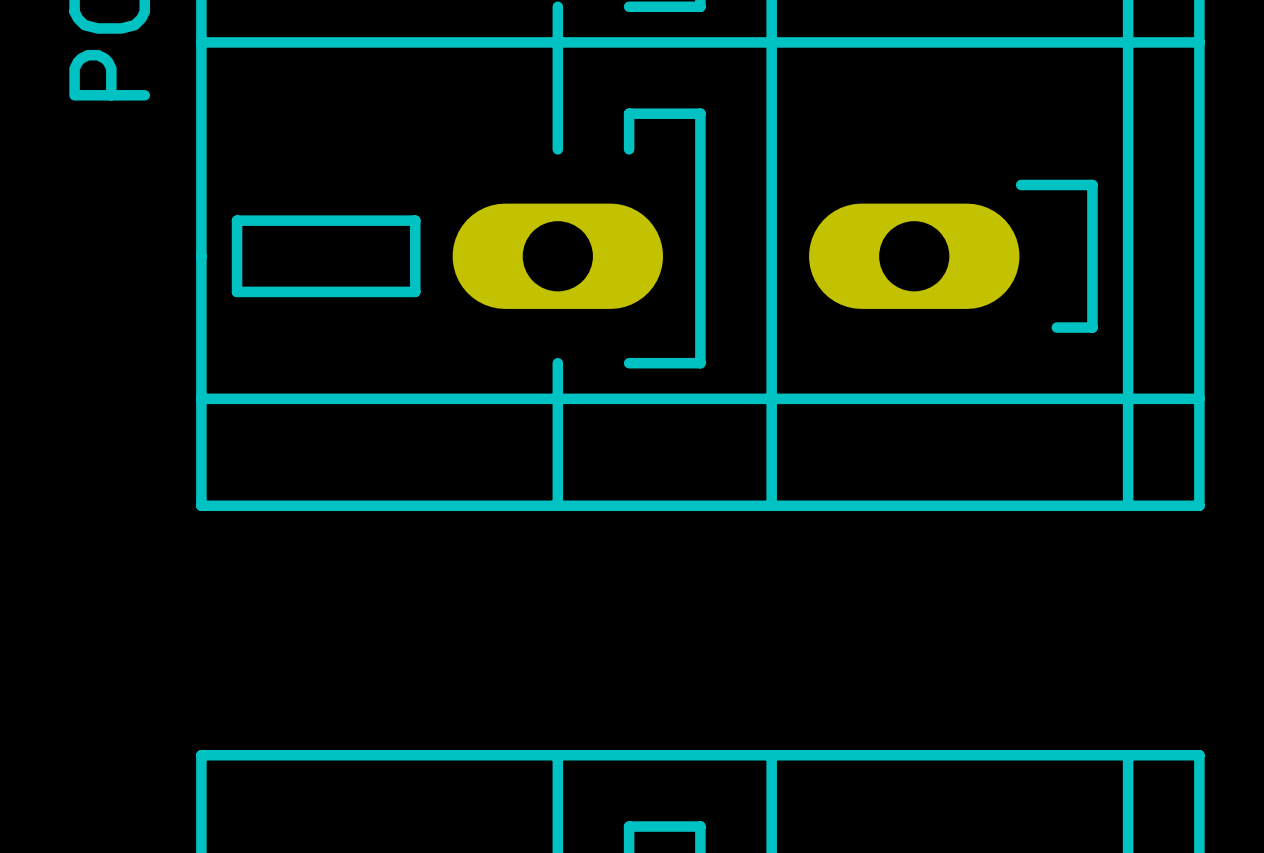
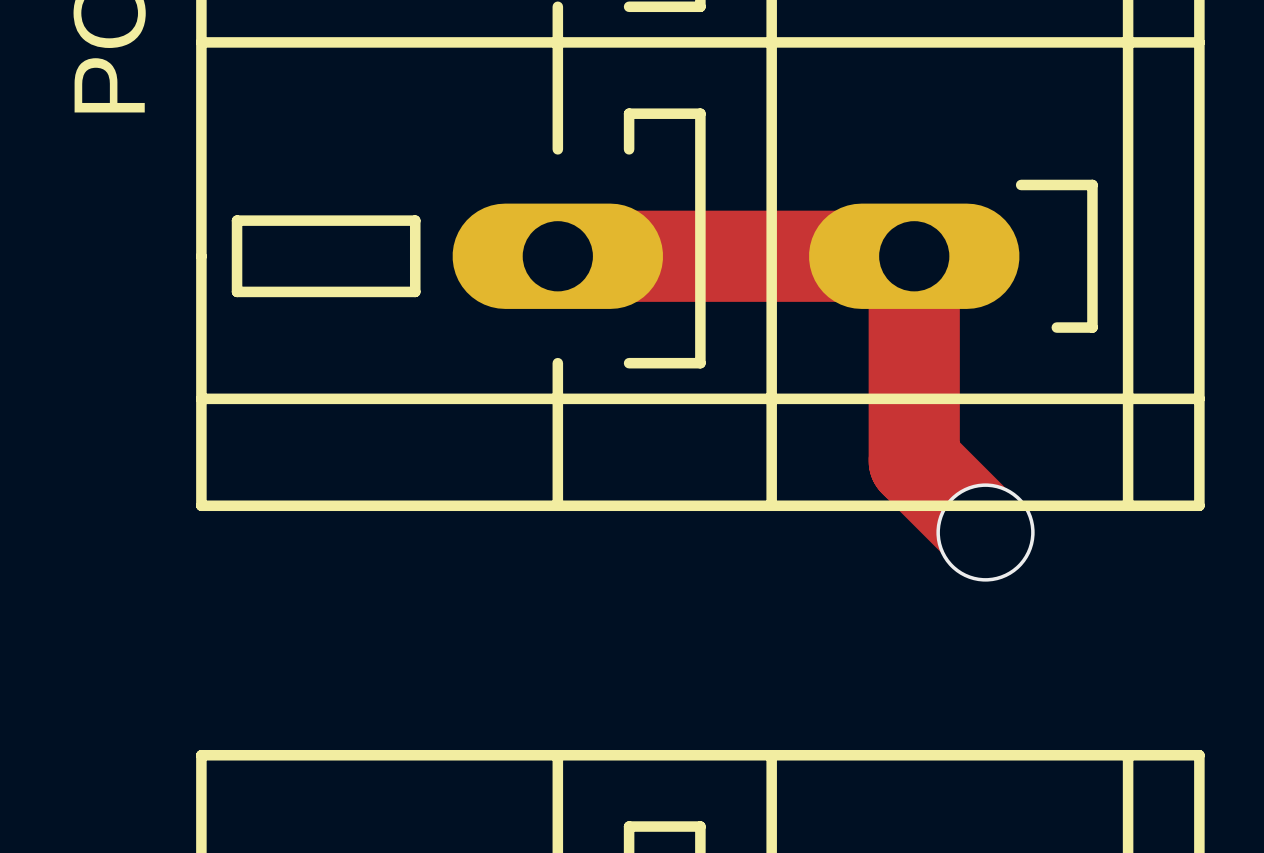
track: none -> (557, 256) (914, 256) (914, 461) (985, 532)
via: none -> (985, 532)

